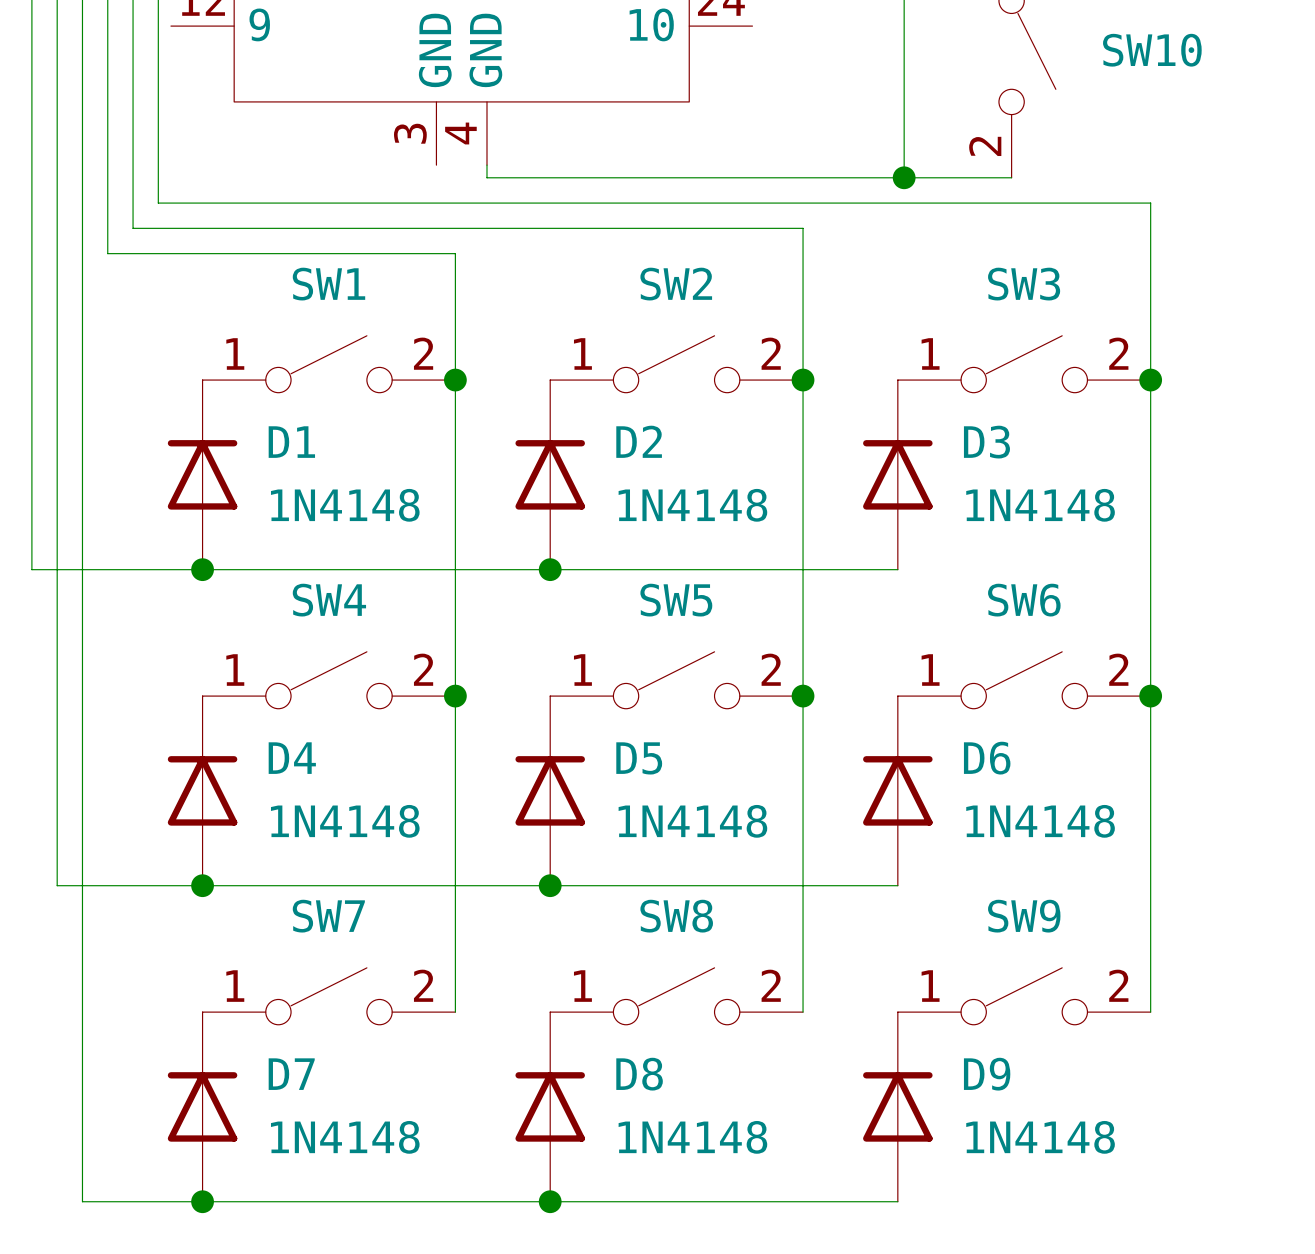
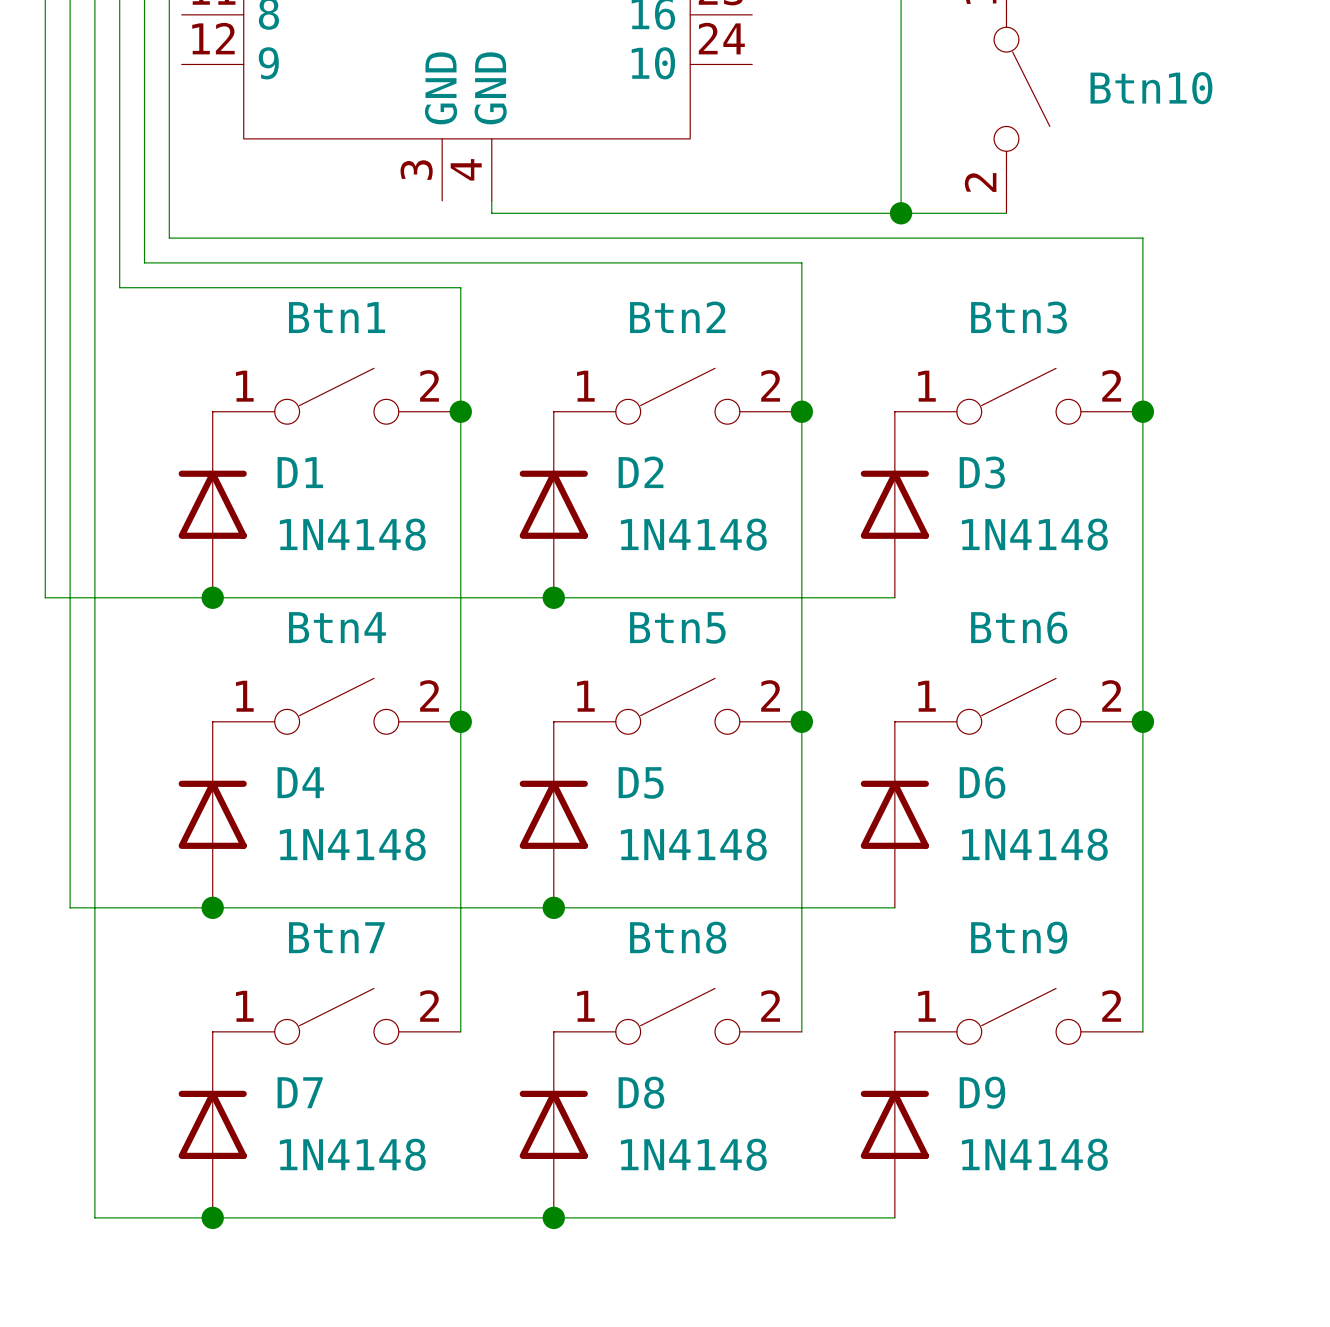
SW10 name: SW10 (1152, 50) -> Btn10 (1151, 88)
SW1 name: SW1 (328, 284) -> Btn1 (337, 317)
SW2 name: SW2 (676, 284) -> Btn2 (677, 317)
SW3 name: SW3 (1024, 284) -> Btn3 (1019, 317)
SW4 name: SW4 (329, 600) -> Btn4 (337, 627)
SW5 name: SW5 (676, 600) -> Btn5 (677, 627)
SW6 name: SW6 (1024, 600) -> Btn6 (1019, 627)
SW7 name: SW7 (328, 916) -> Btn7 (336, 937)
SW8 name: SW8 (676, 916) -> Btn8 (678, 937)
SW9 name: SW9 (1024, 916) -> Btn9 (1019, 937)

